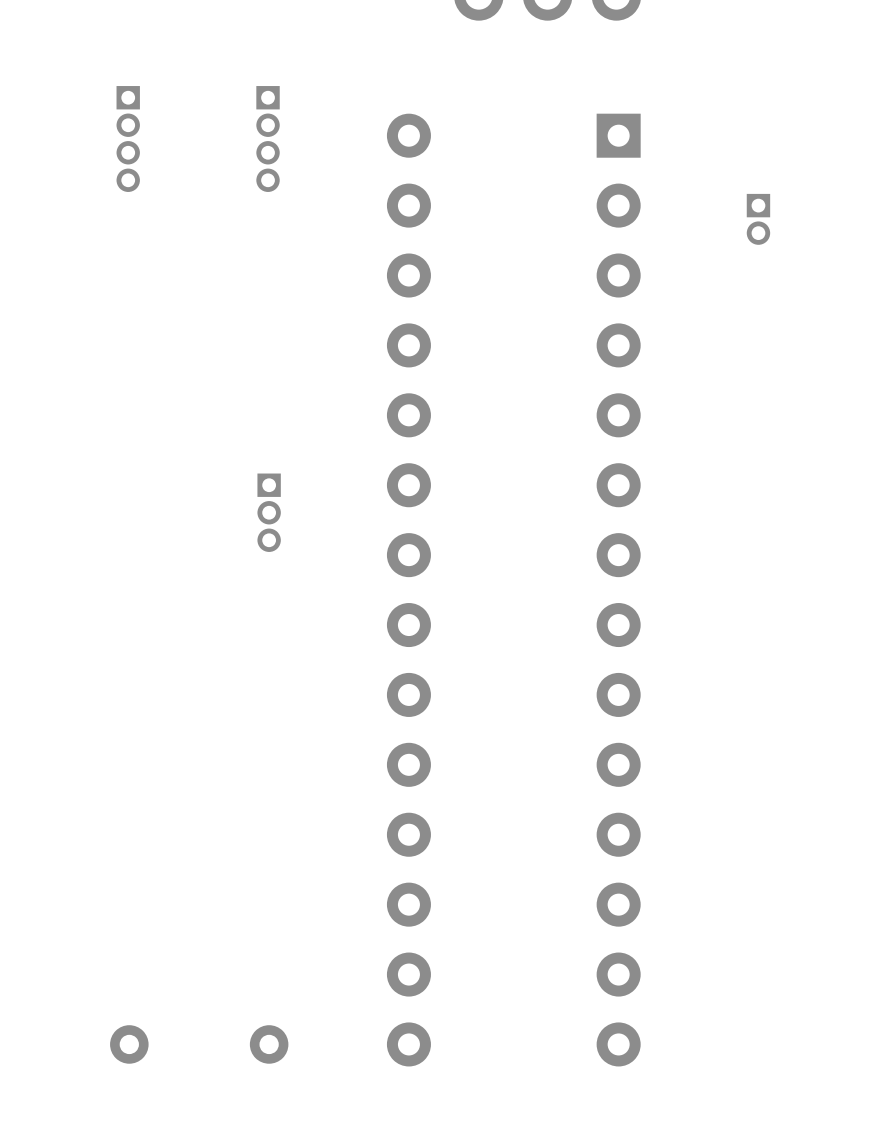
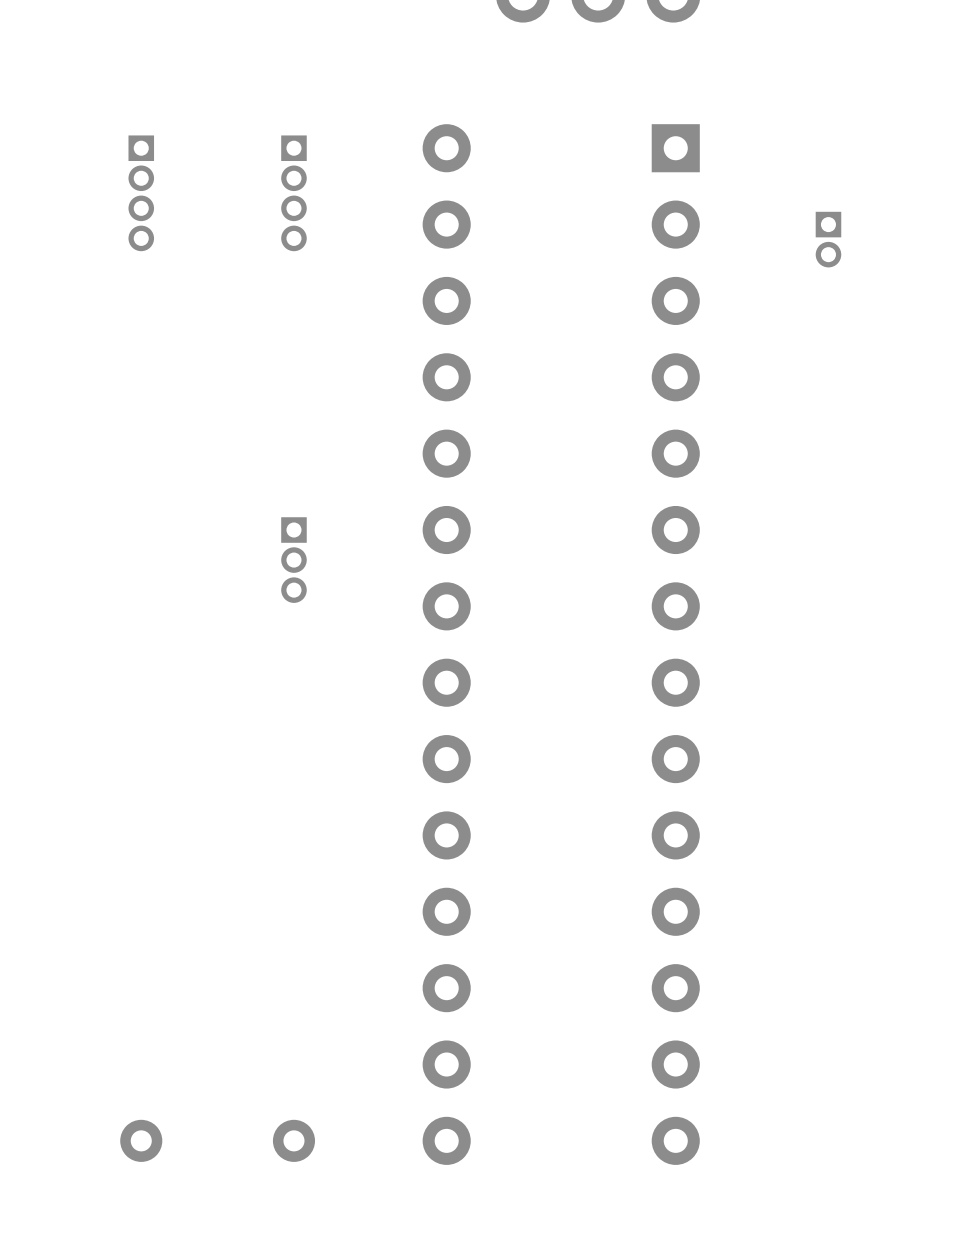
part position: (128, 139) -> (141, 193)
part position: (268, 139) -> (293, 193)

